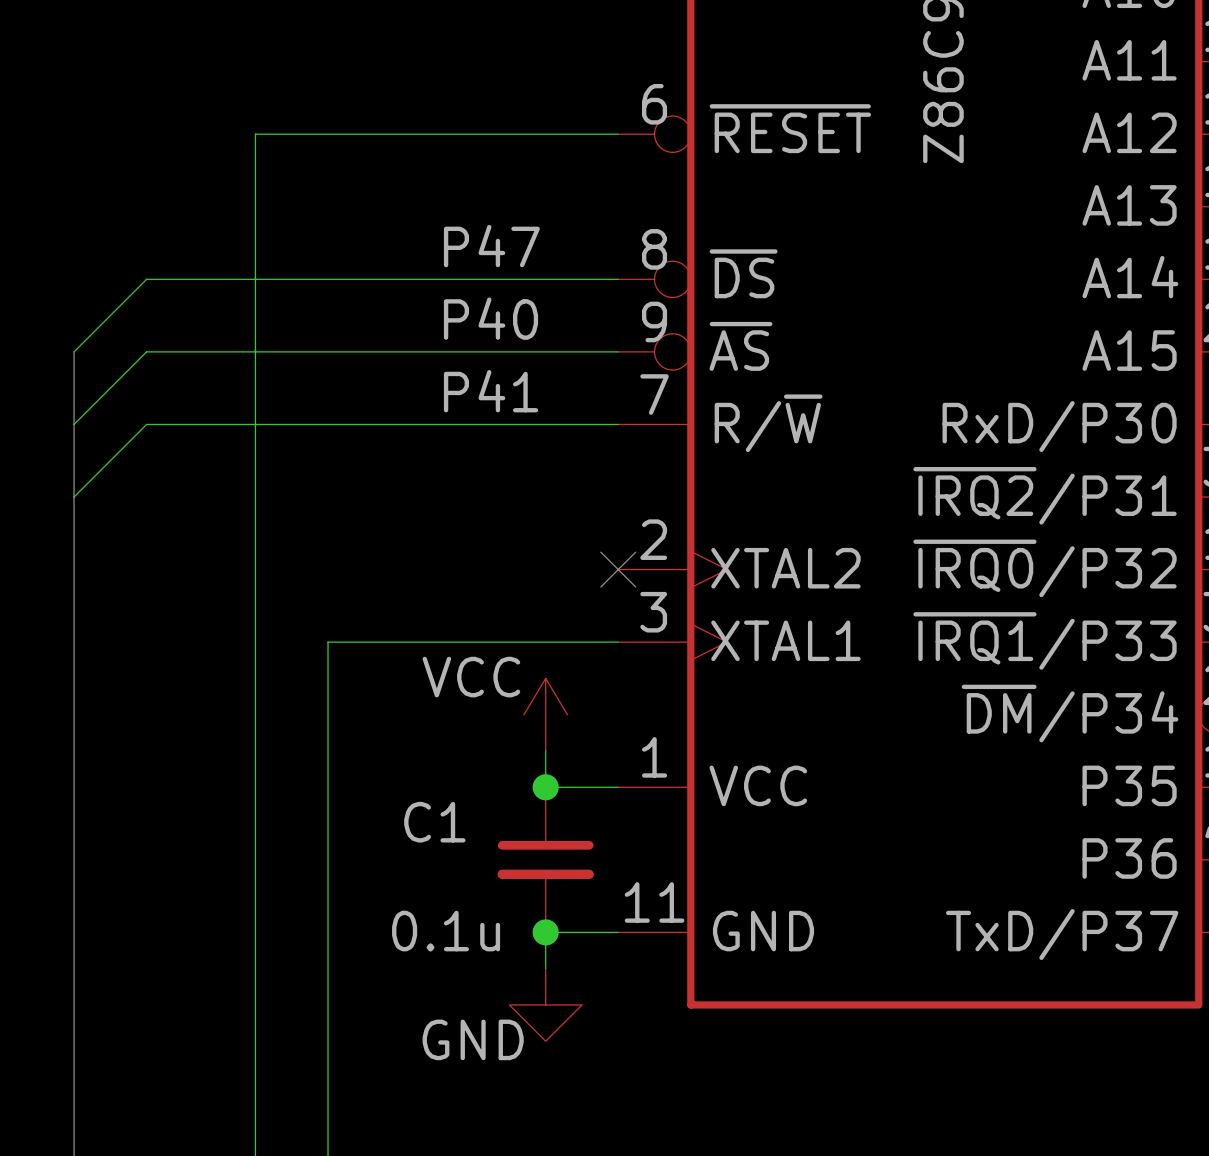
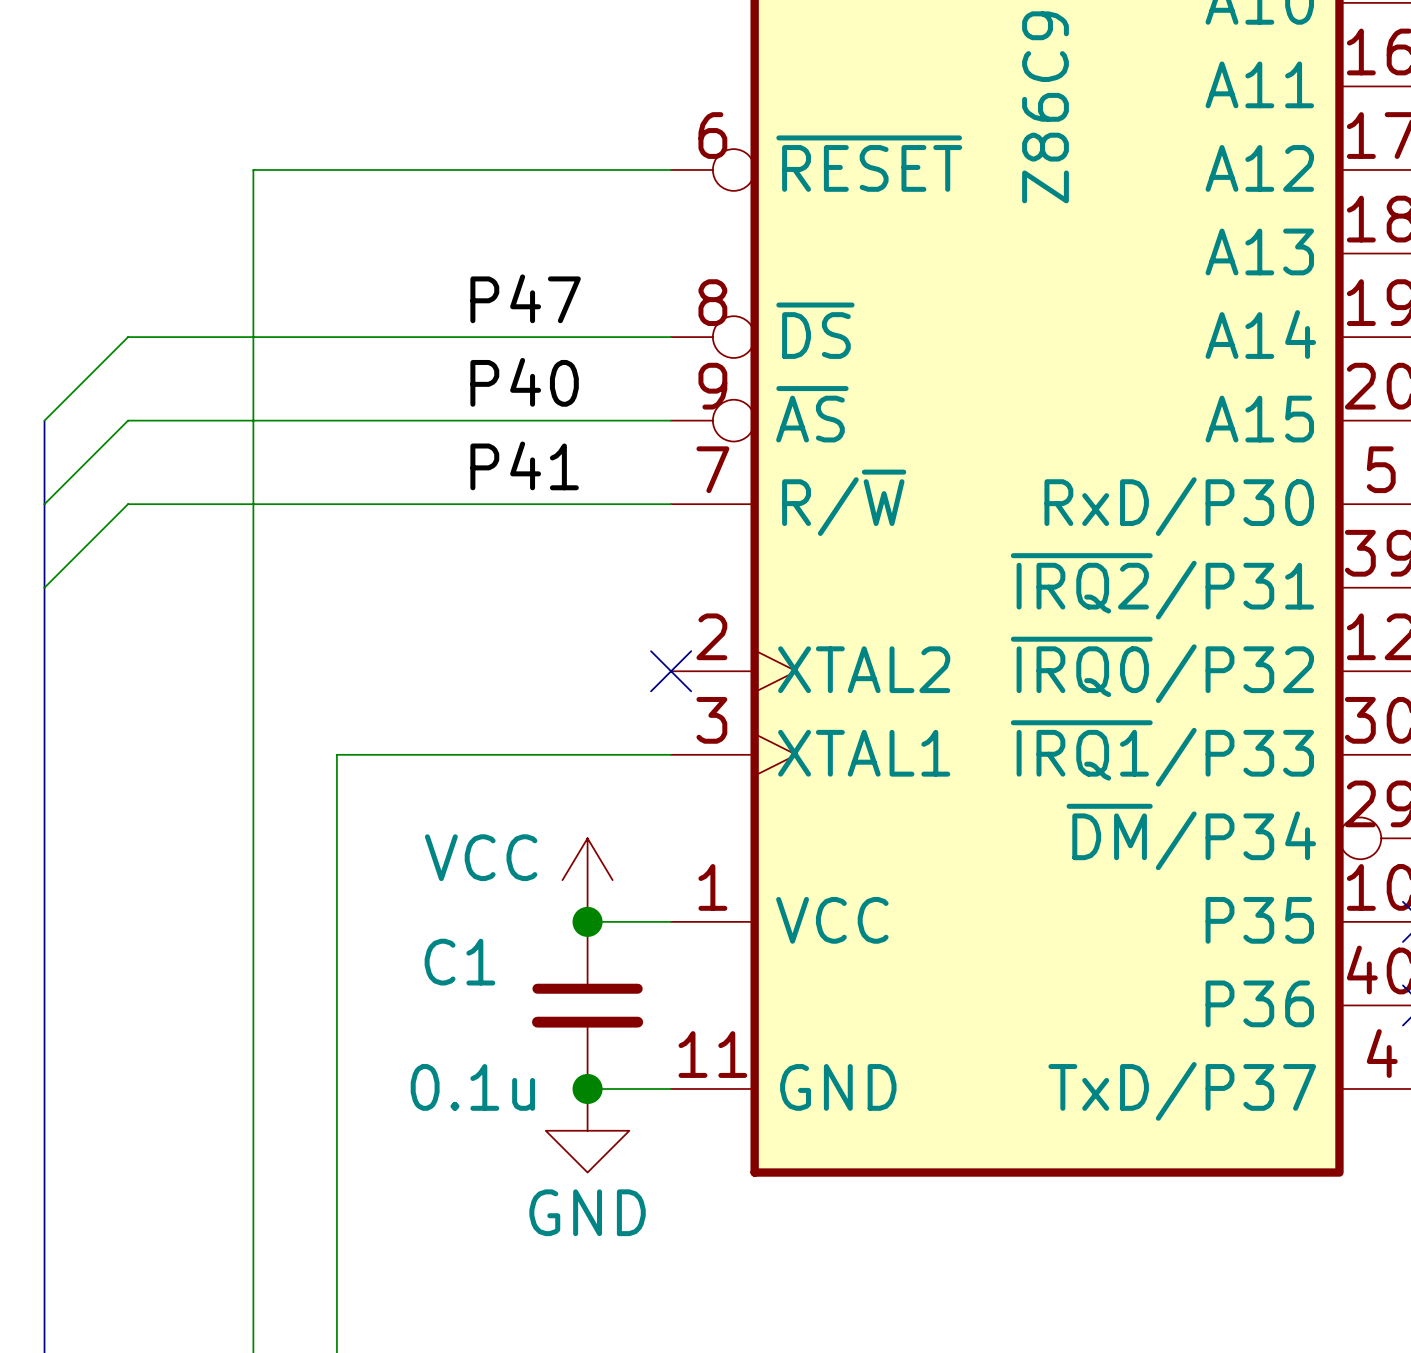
power symbol text position: VCC (471, 677) -> VCC (481, 857)
power symbol position: VCC (545, 714) -> VCC (587, 880)
power symbol position: GND (545, 1004) -> GND (587, 1130)
power symbol text position: GND (473, 1039) -> GND (587, 1212)

